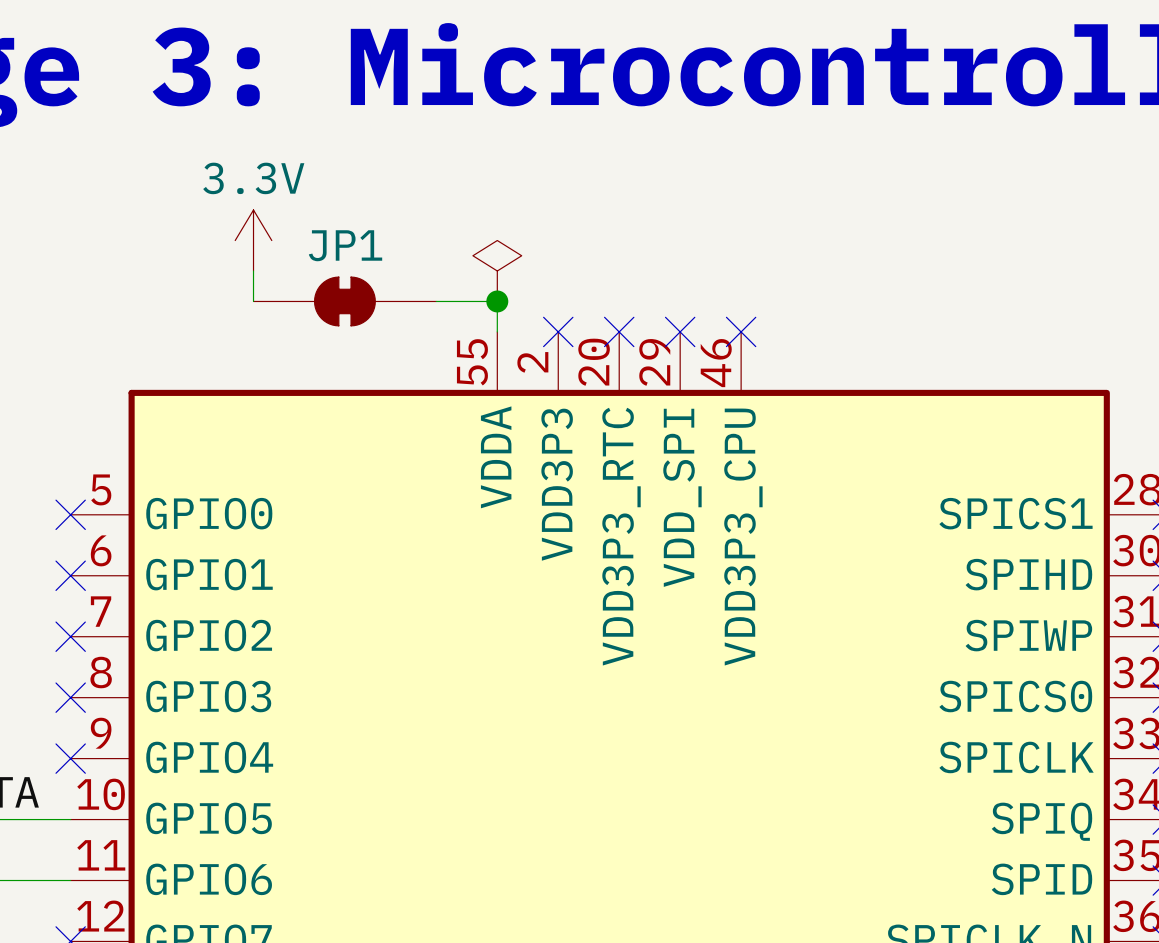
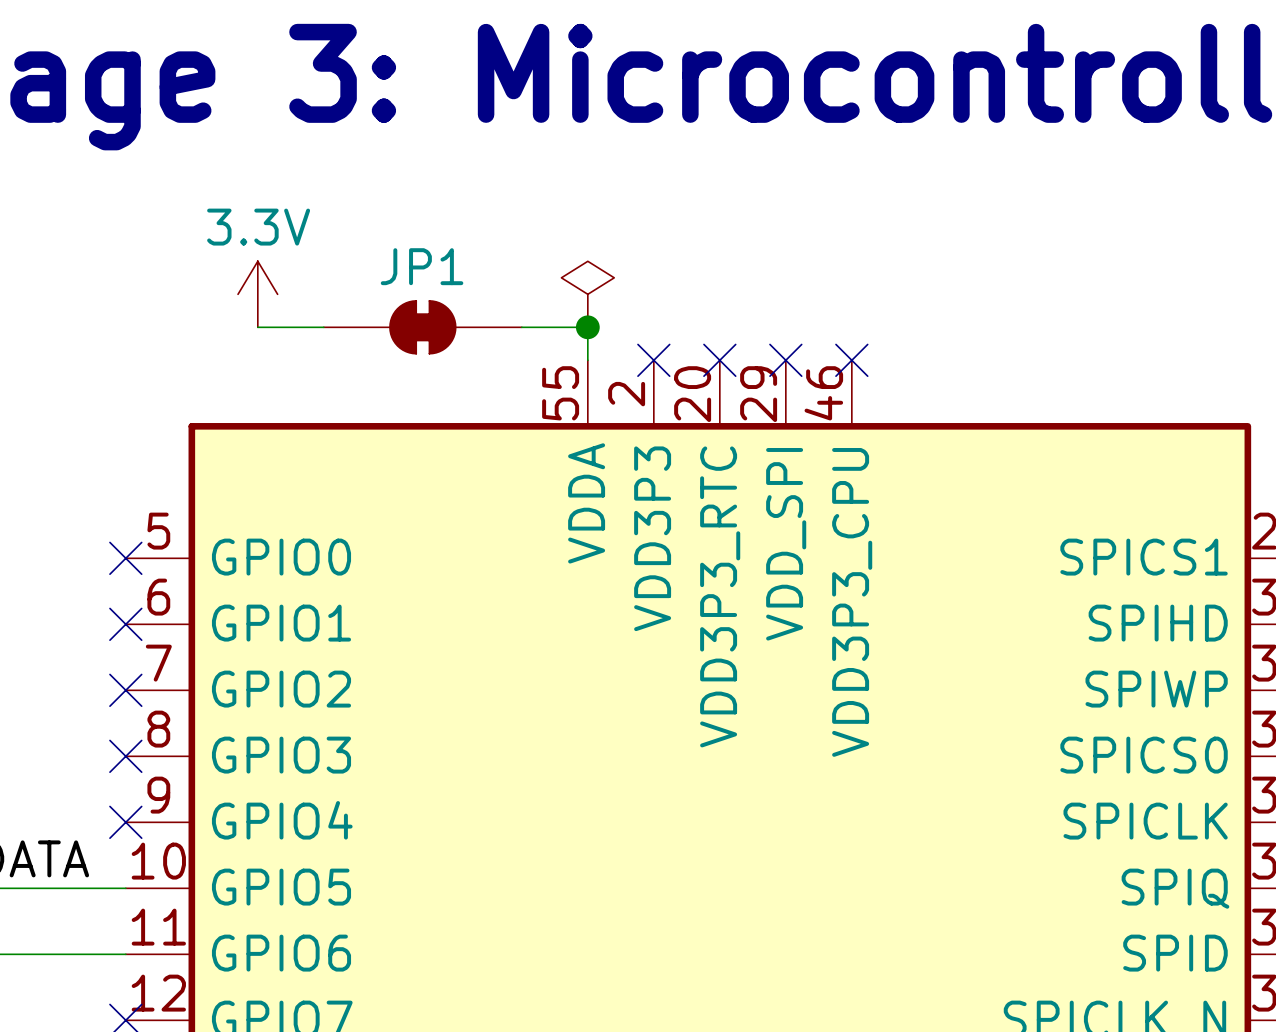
power symbol position: 3.3V (253, 240) -> 3.3V (257, 294)
wire: (253, 271) (253, 301) -> (257, 327) (323, 327)

